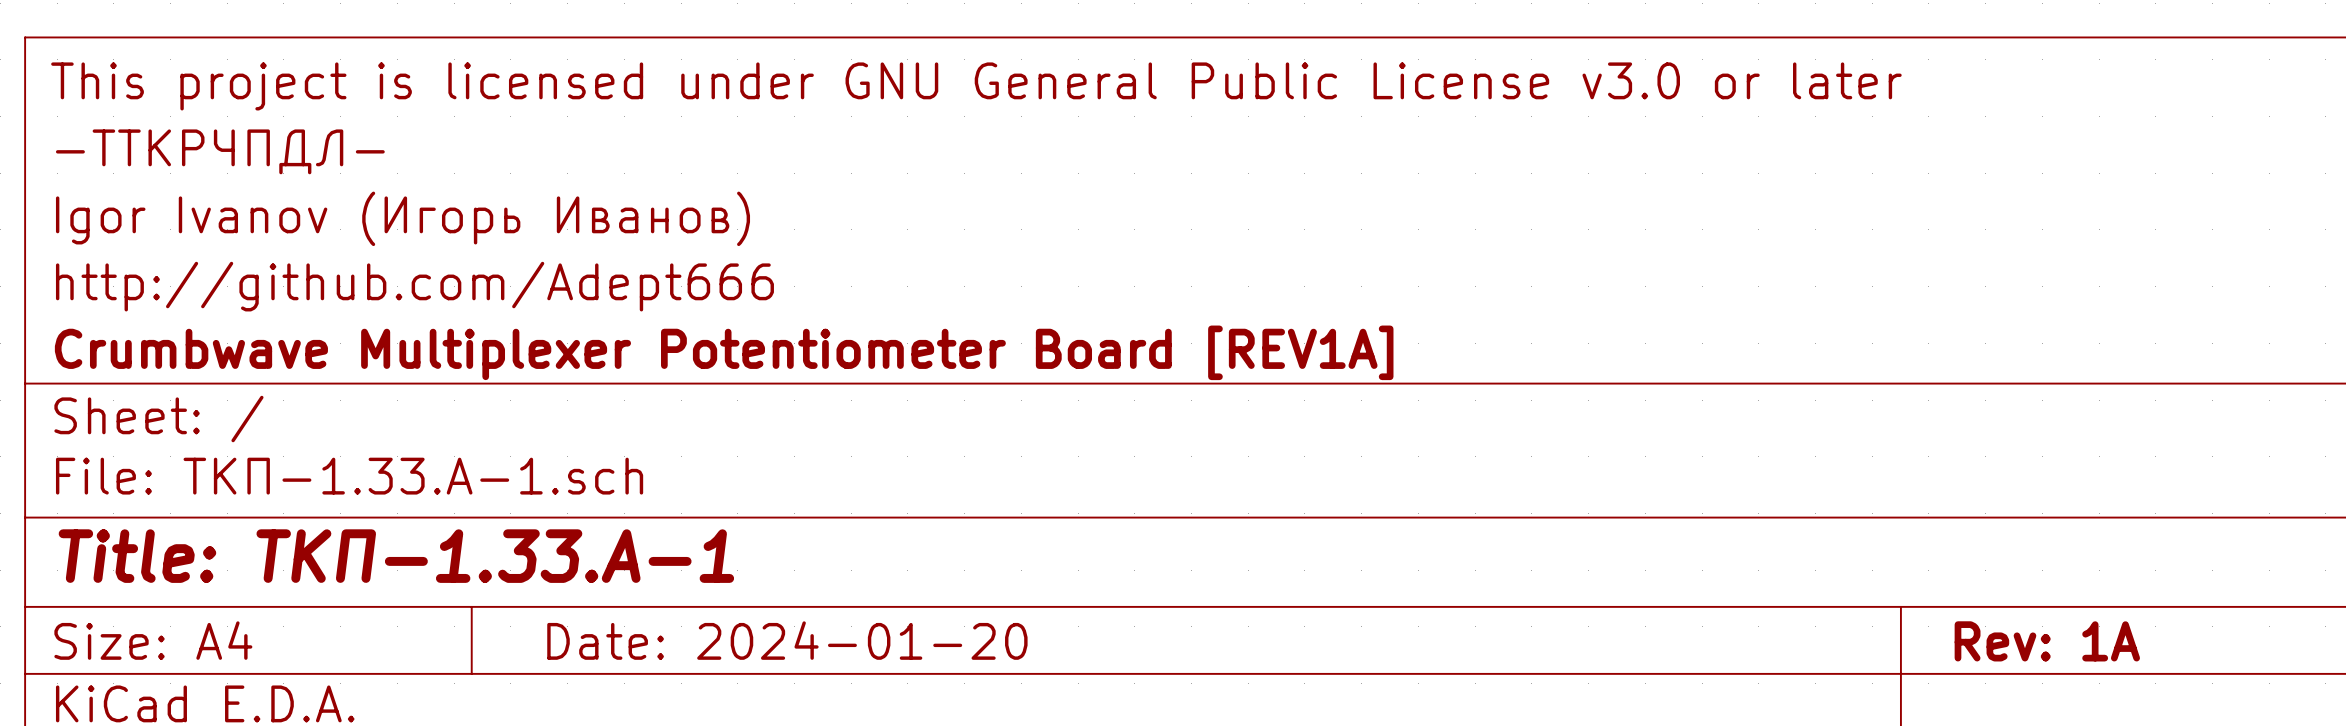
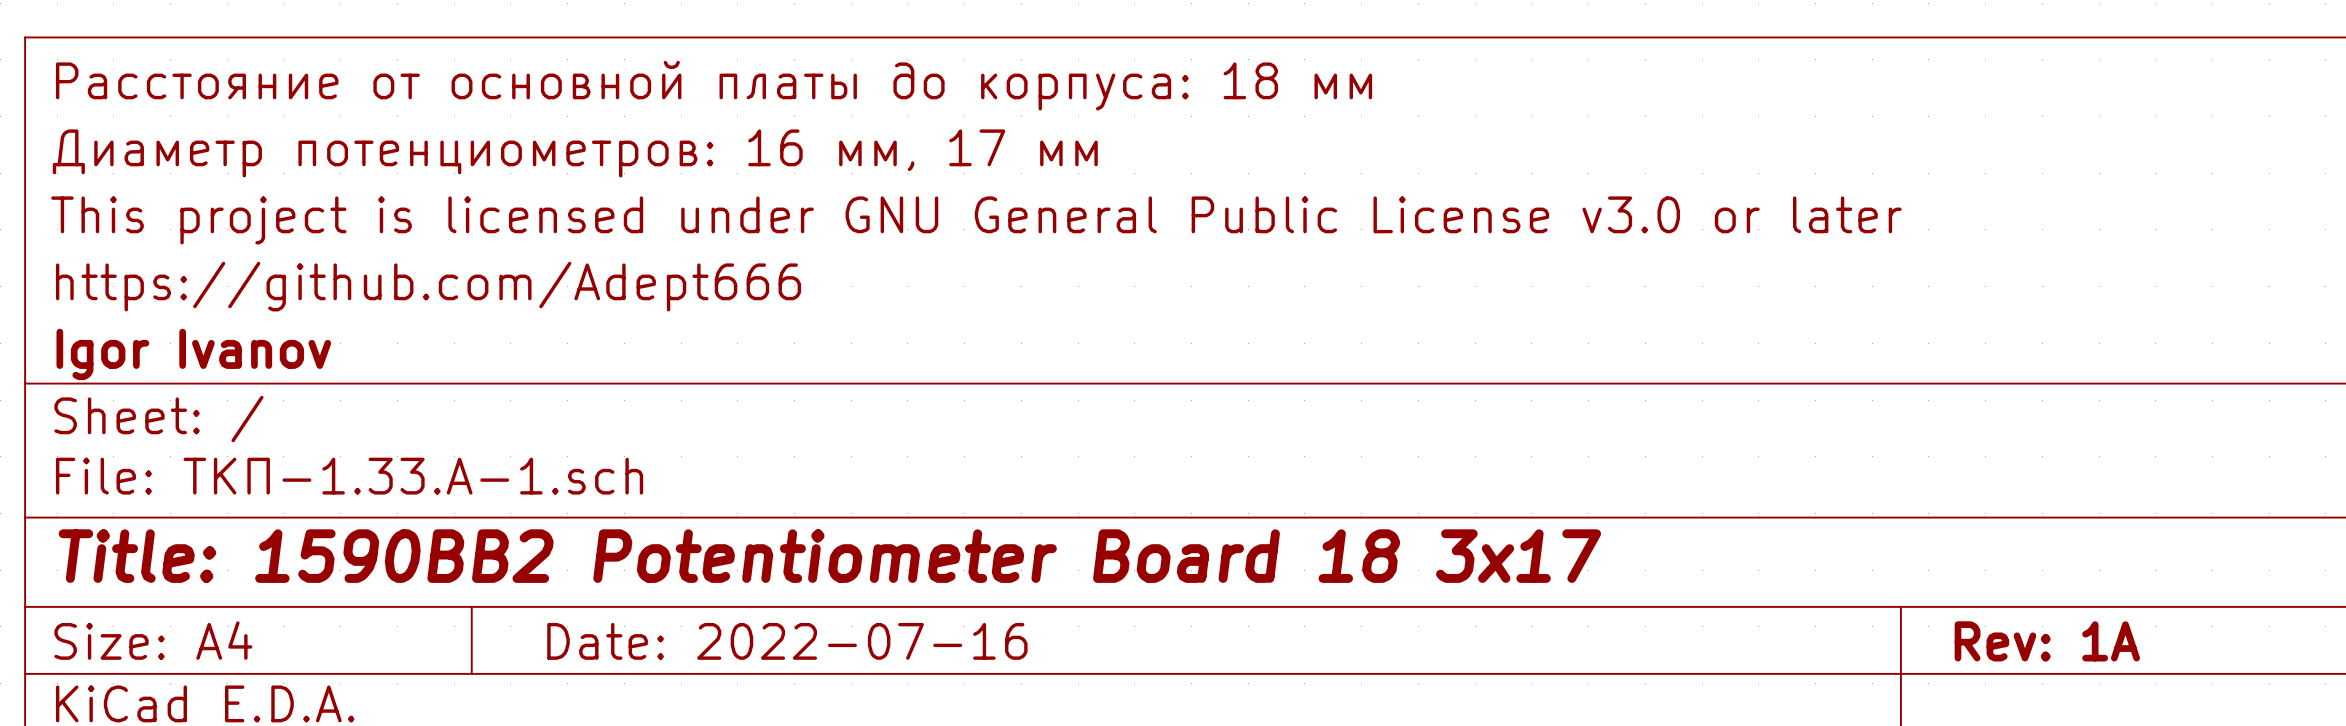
title block: This project is licensed under GNU General Public License v3.0 or later (976, 86) -> Расстояние от основной платы до корпуса: 18 мм (714, 85)
title block: -ТТКРЧПДЛ- (220, 151) -> Диаметр потенциометров: 16 мм, 17 мм (575, 153)
title block: Igor Ivanov (Игорь Иванов) (402, 218) -> This project is licensed under GNU General Public License v3.0 or later (976, 220)
title block: http://github.com/Adept666 (414, 286) -> https://github.com/Adept666 (428, 286)
title block: Crumbwave Multiplexer Potentiometer Board [REV1A] (724, 352) -> Igor Ivanov (193, 354)
title block: Title: ТКП-1.33.A-1 (396, 556) -> Title: 1590BB2 Potentiometer Board 18 3x17 (829, 556)
title block: Date: 2024-01-20 (787, 640) -> Date: 2022-07-16 (787, 641)

